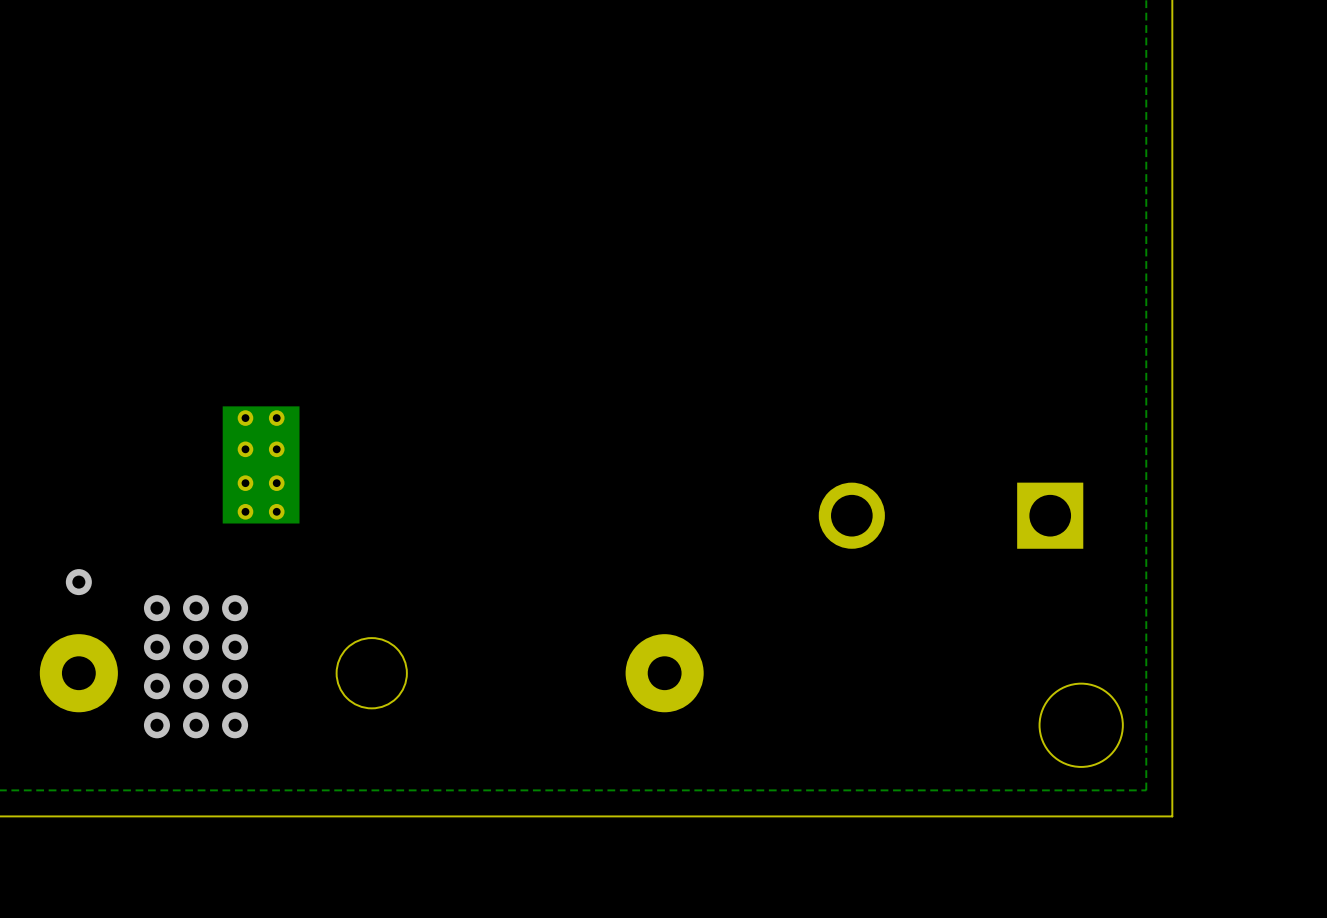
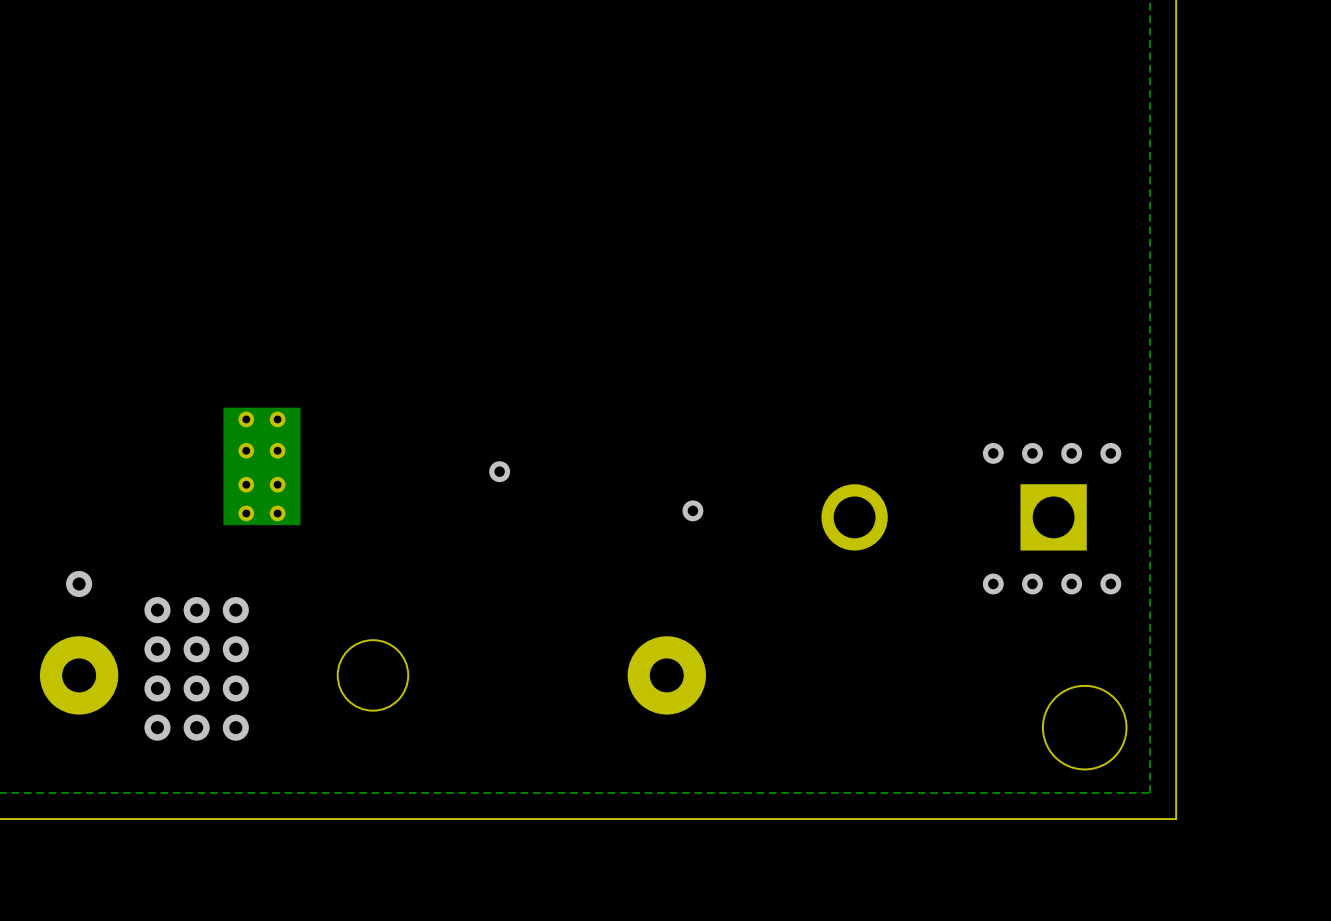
via: none -> (993, 453)
via: none -> (1032, 453)
via: none -> (1071, 453)
via: none -> (1110, 453)
via: none -> (499, 471)
via: none -> (692, 510)
via: none -> (993, 583)
via: none -> (1032, 583)
via: none -> (1071, 583)
via: none -> (1110, 583)

